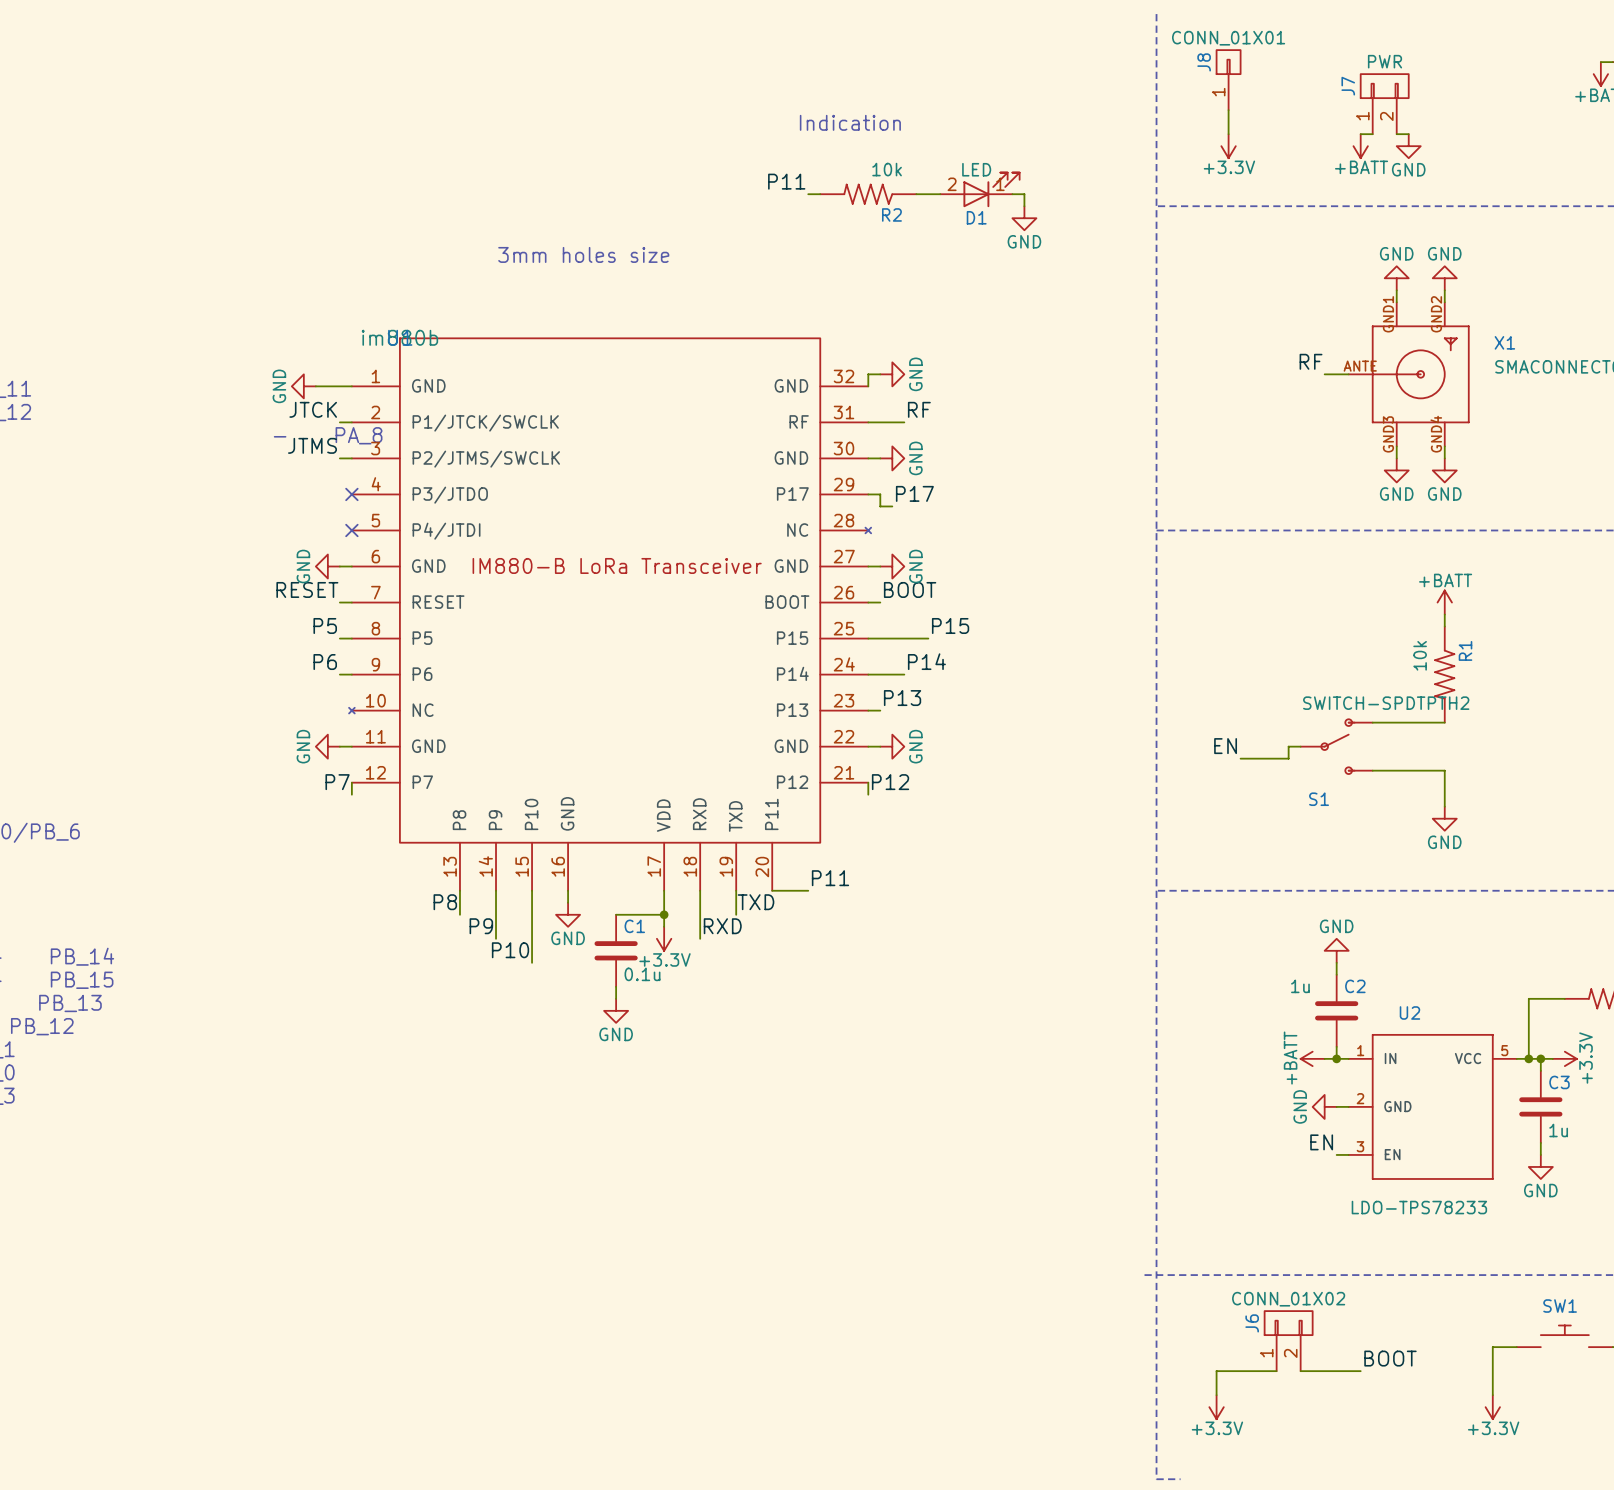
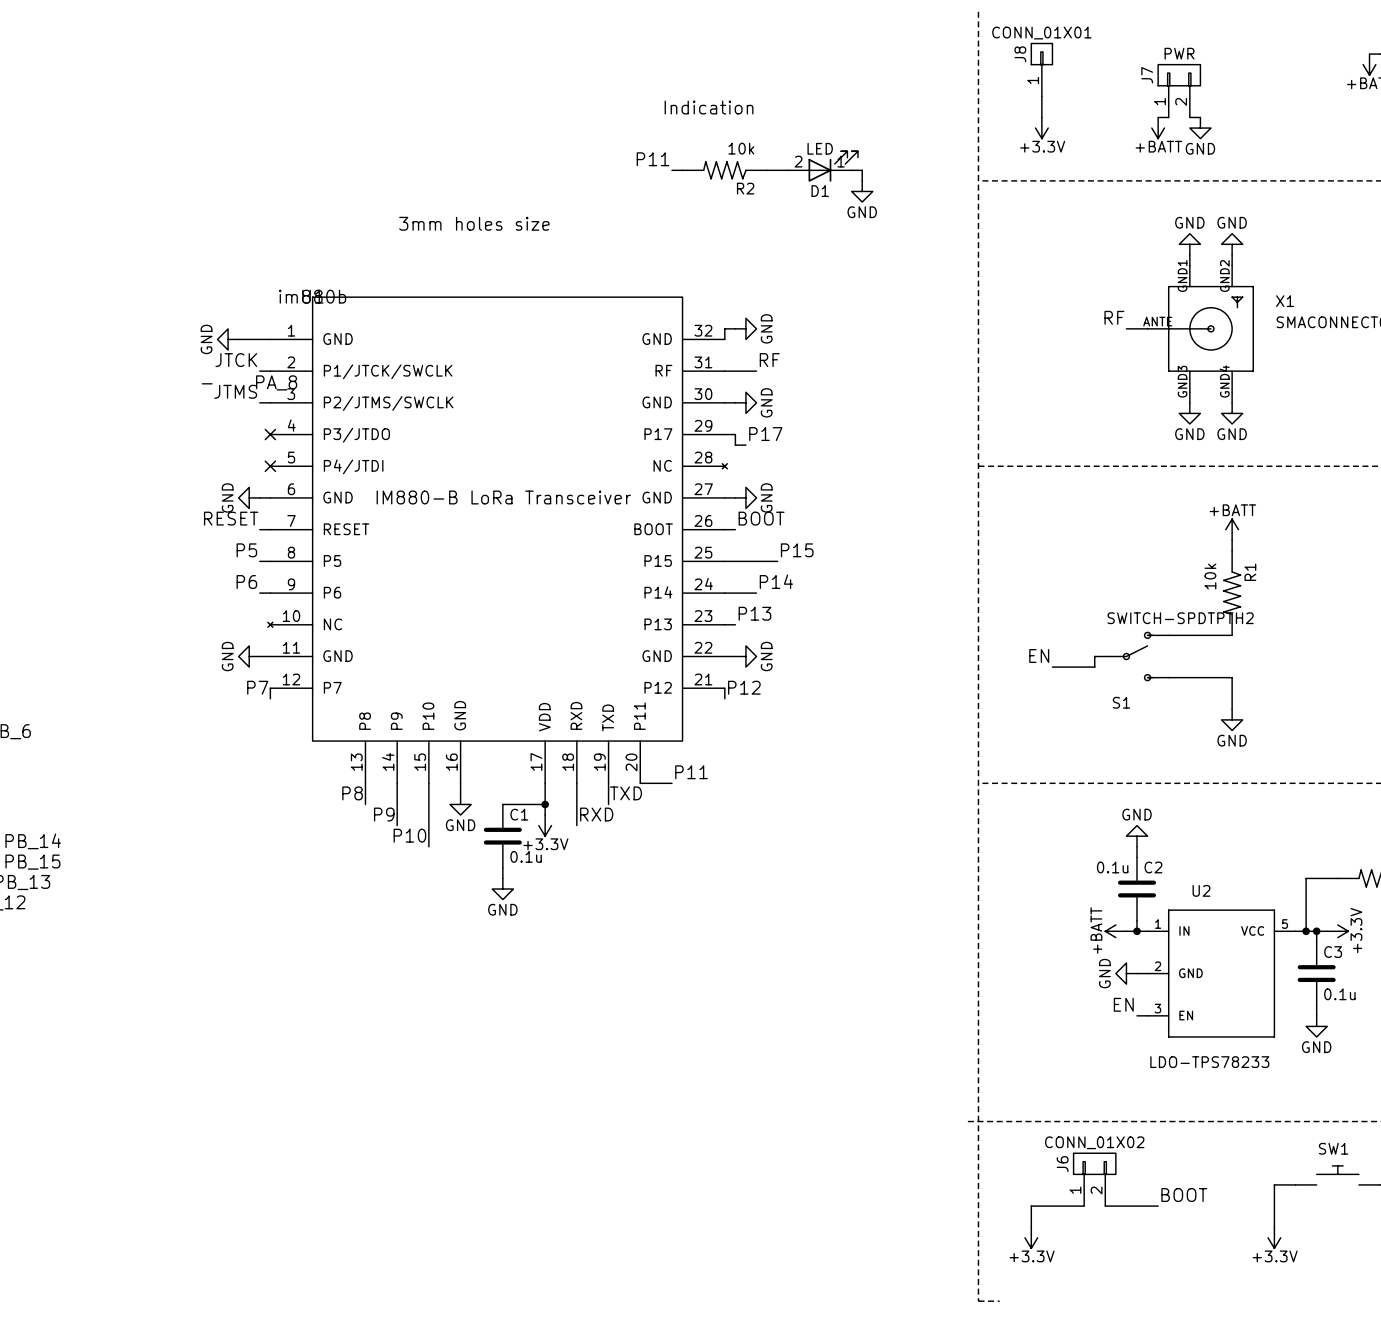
C2 value: 1u (1300, 986) -> 0.1u (1112, 867)
C3 value: 1u (1558, 1130) -> 0.1u (1339, 994)

